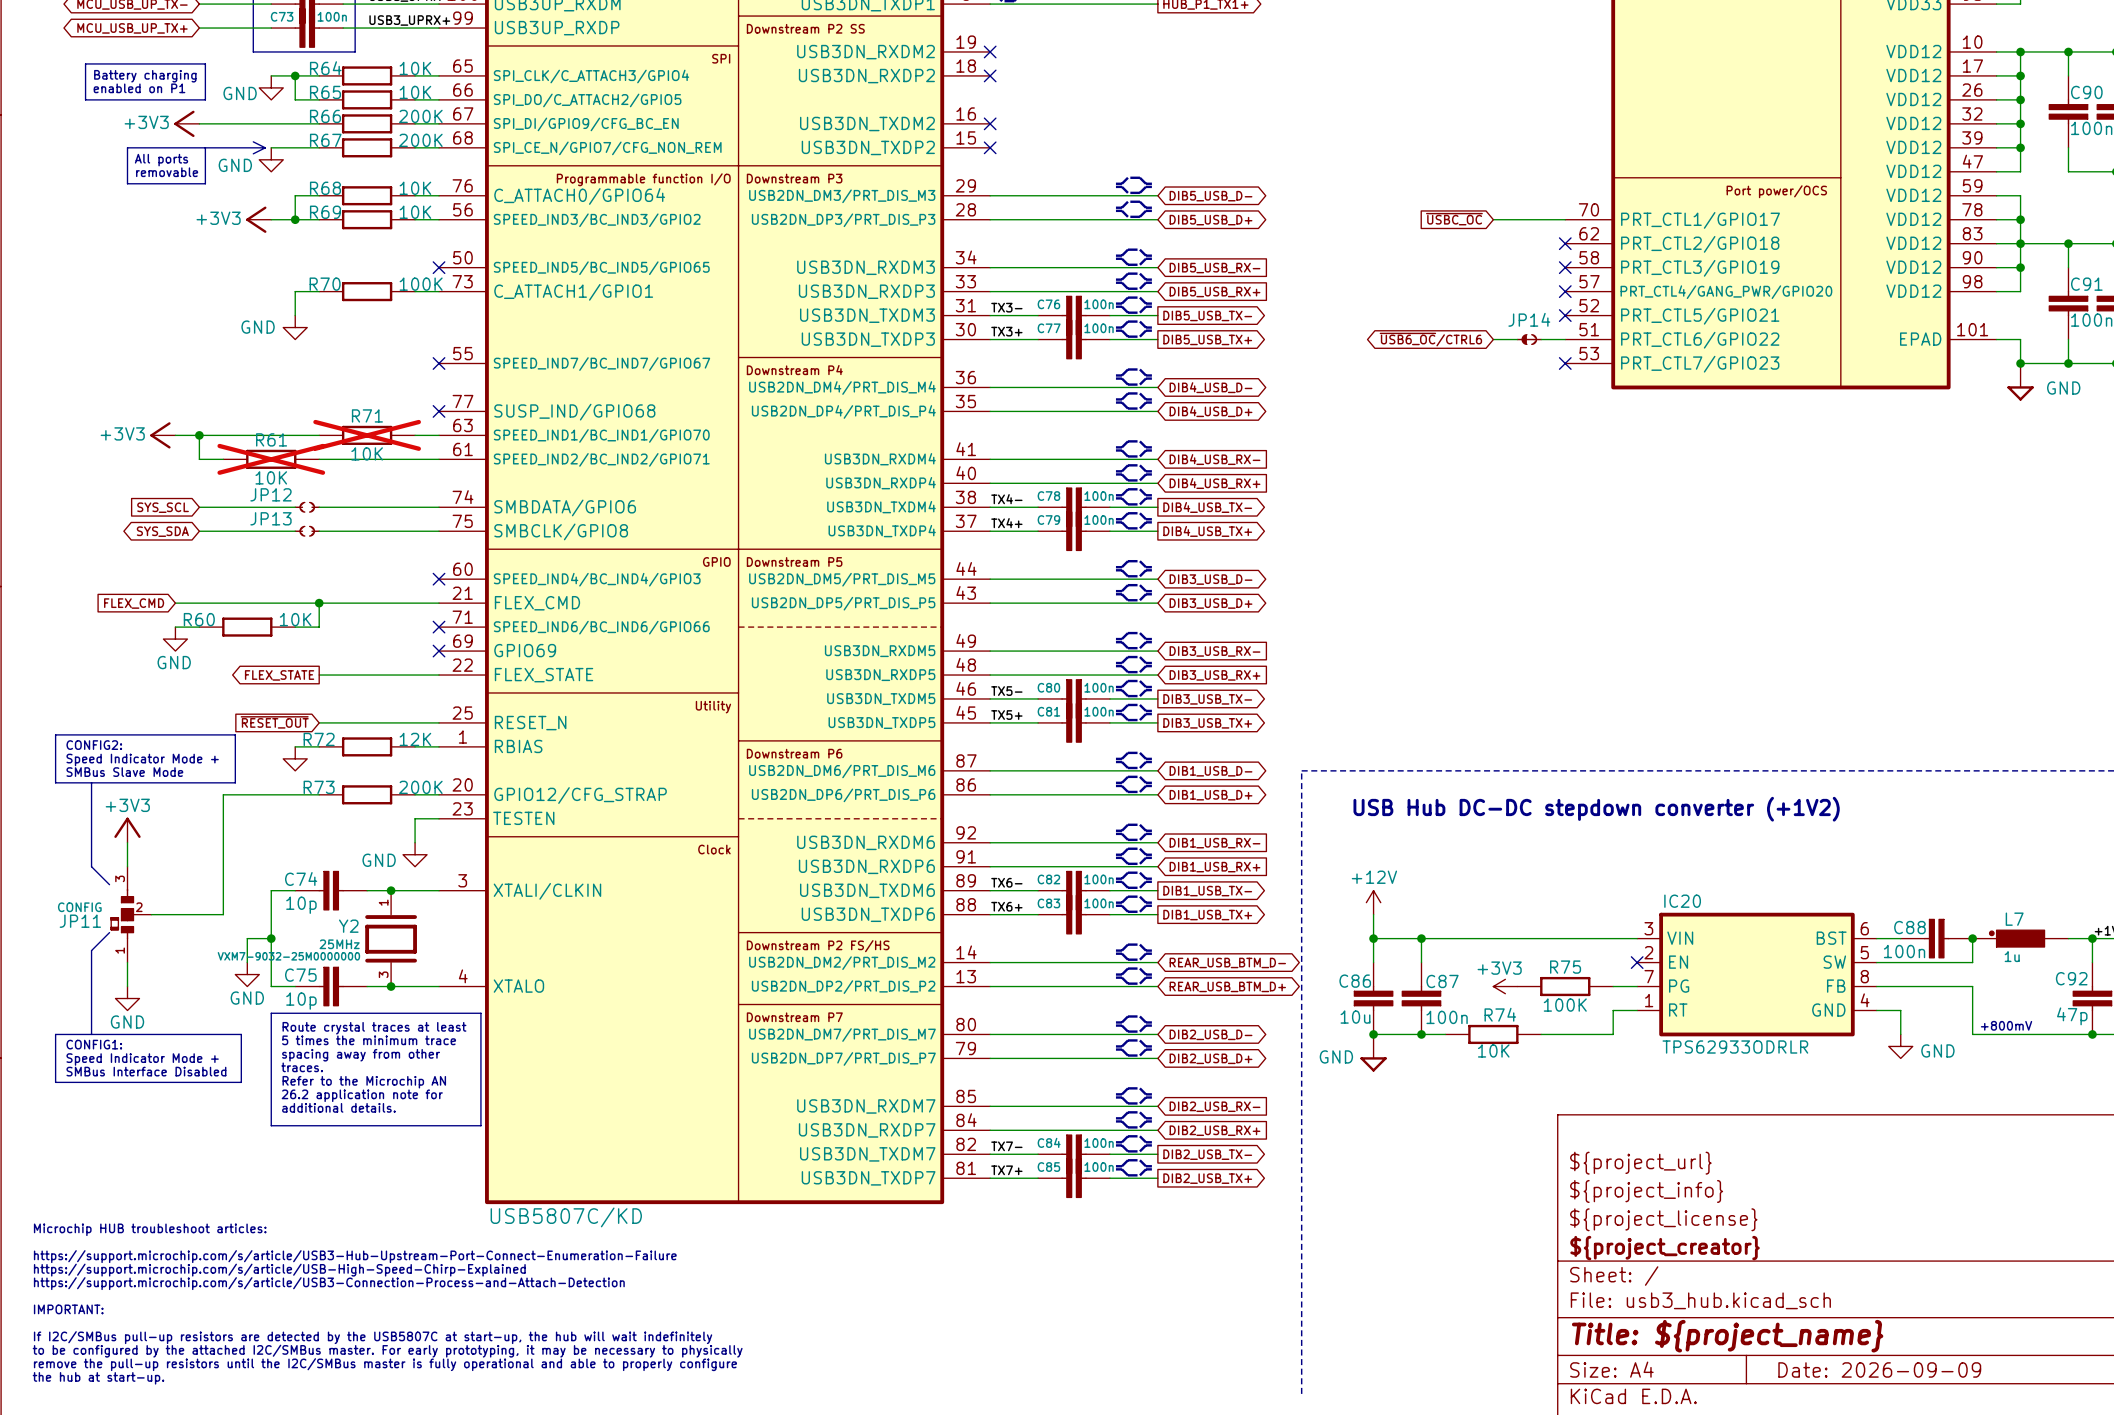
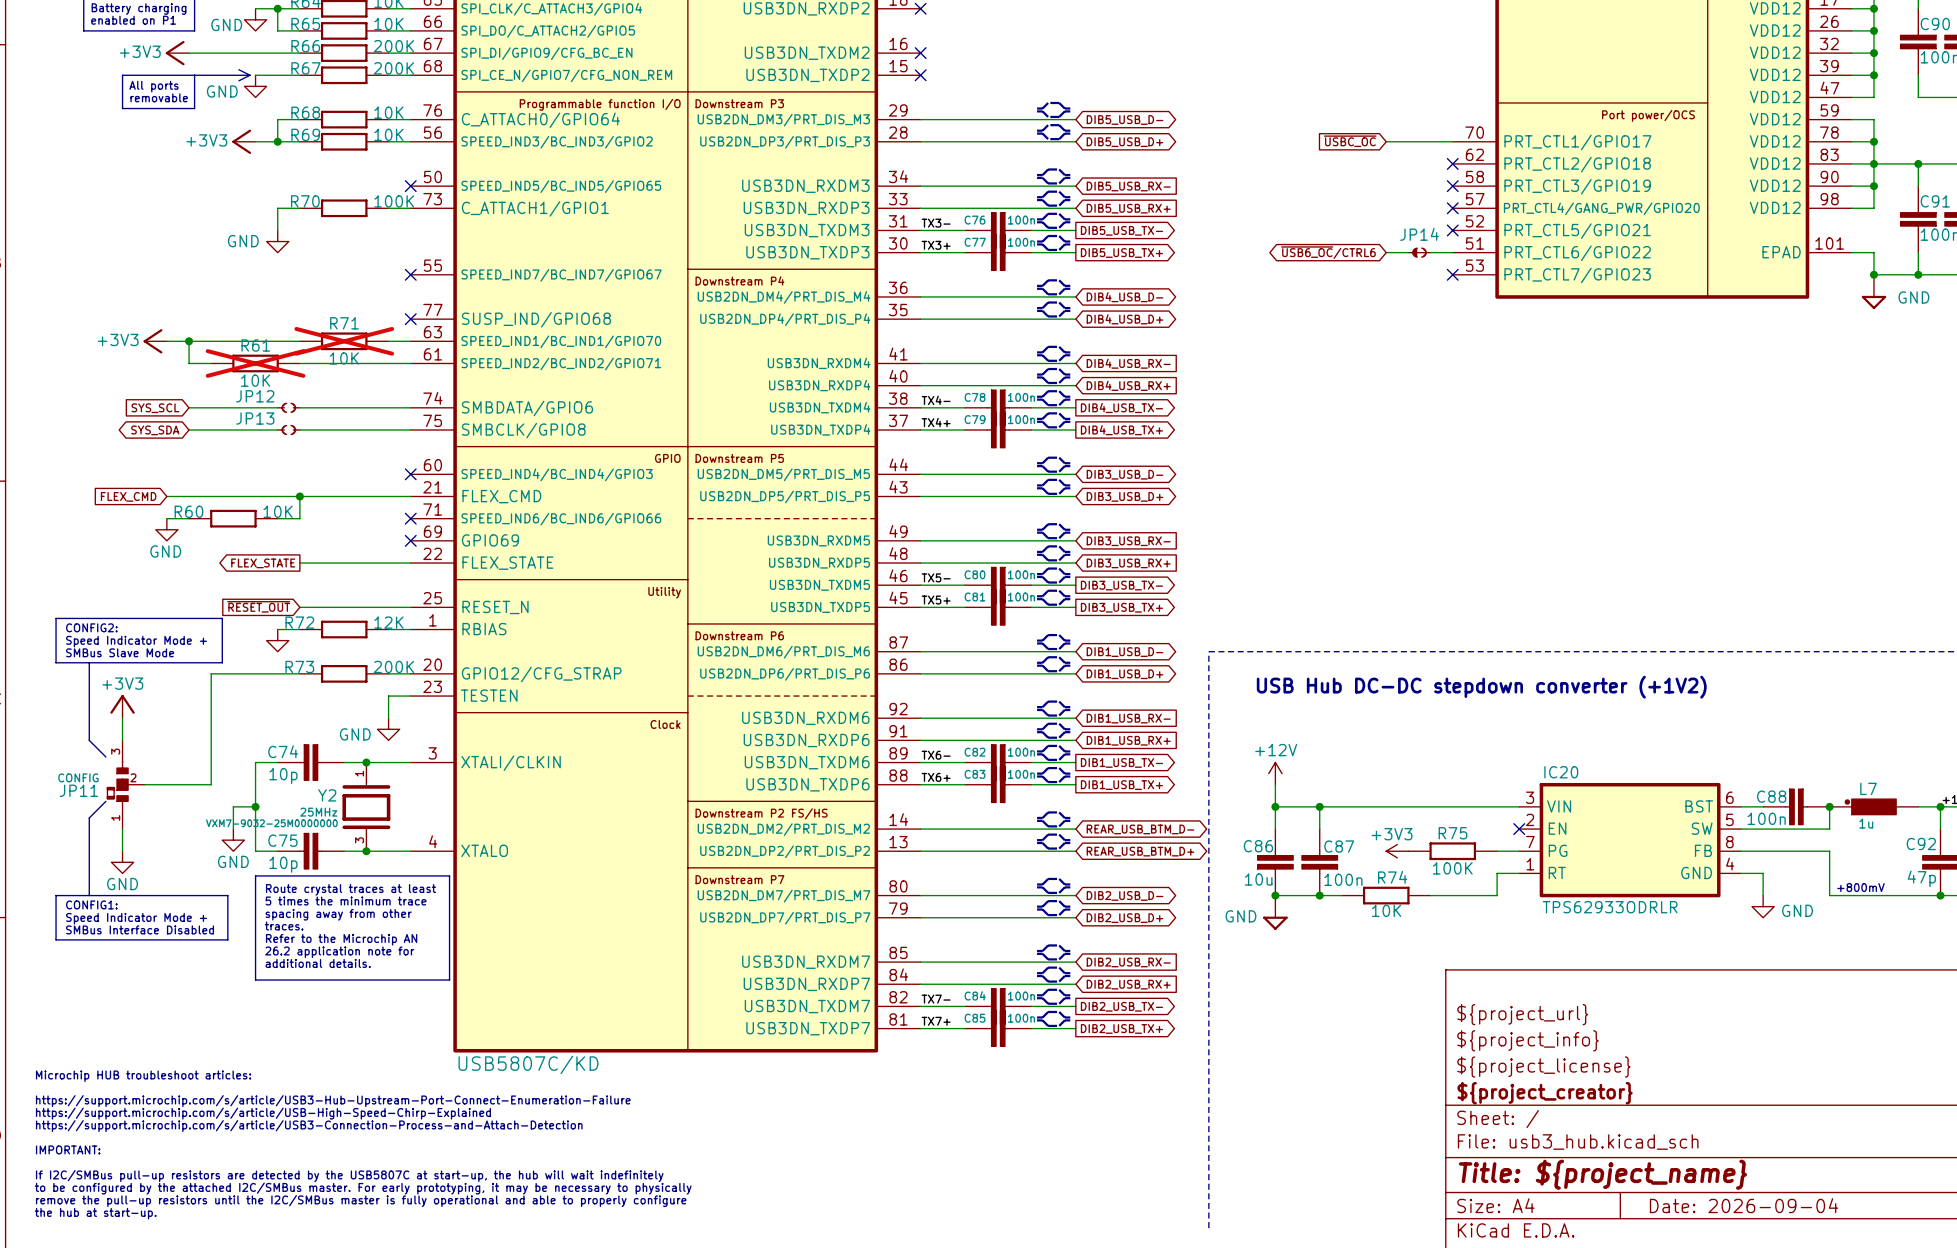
title block: Date: 2026-09-09 (1879, 1369) -> Date: 2026-09-04 (1744, 1205)

